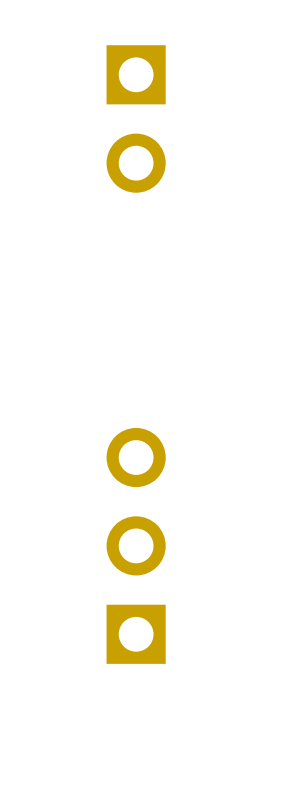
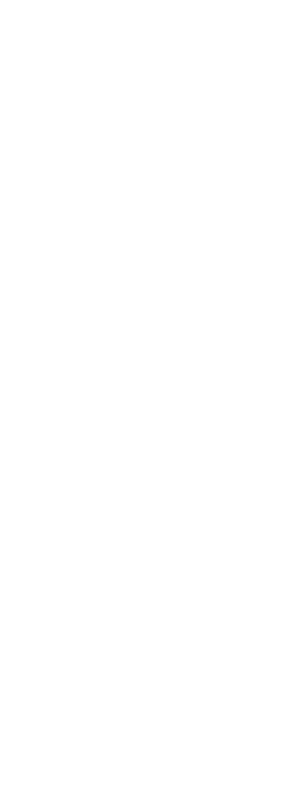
part: (136, 118) -> none
part: (136, 545) -> none

